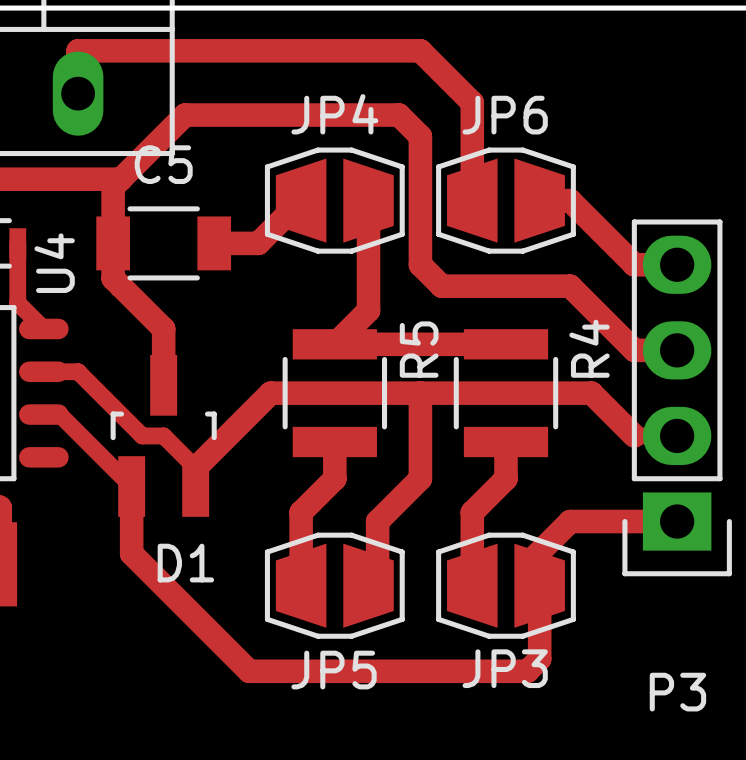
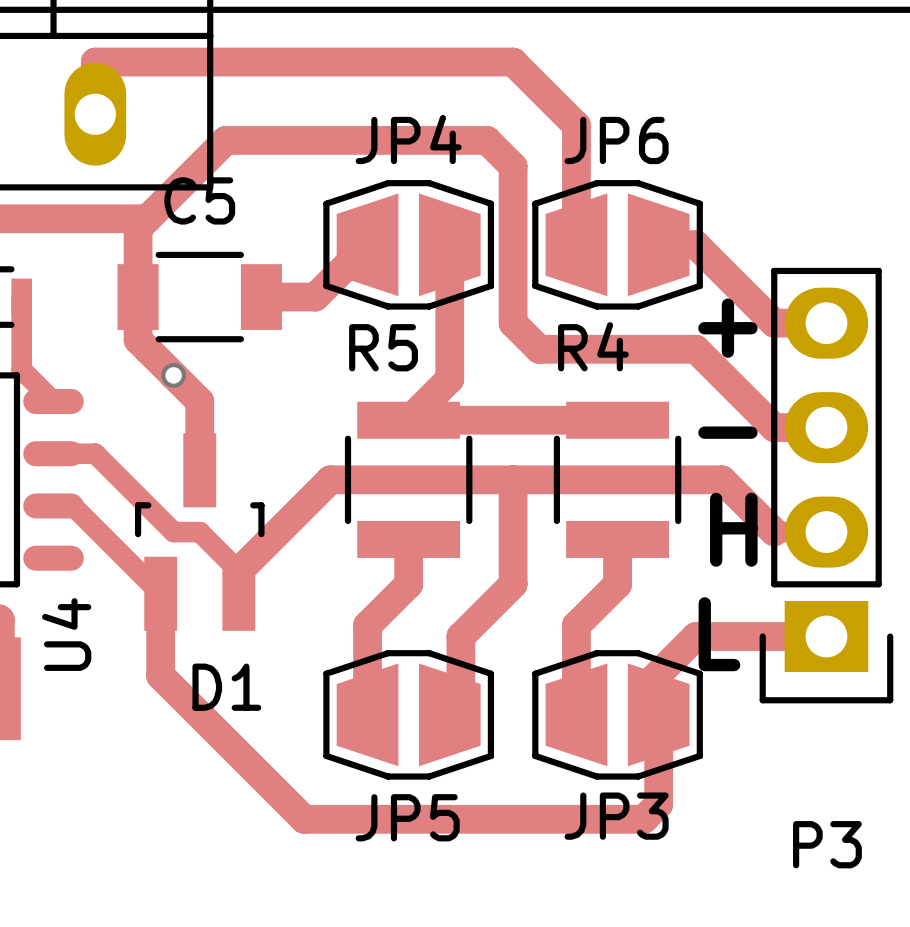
U4 name position: U4 (54, 263) -> U4 (66, 634)
text: none -> + (727, 328)
via: none -> (173, 375)
R4 name rotation: 0° (589, 348) -> 90° clockwise (593, 346)
R4 name position: R4 (589, 348) -> R4 (593, 346)
R5 name rotation: 0° (419, 349) -> 90° clockwise (383, 347)
R5 name position: R5 (419, 349) -> R5 (383, 347)
text: none -> - (727, 432)
text: none -> H (733, 529)
text: none -> L (719, 634)

